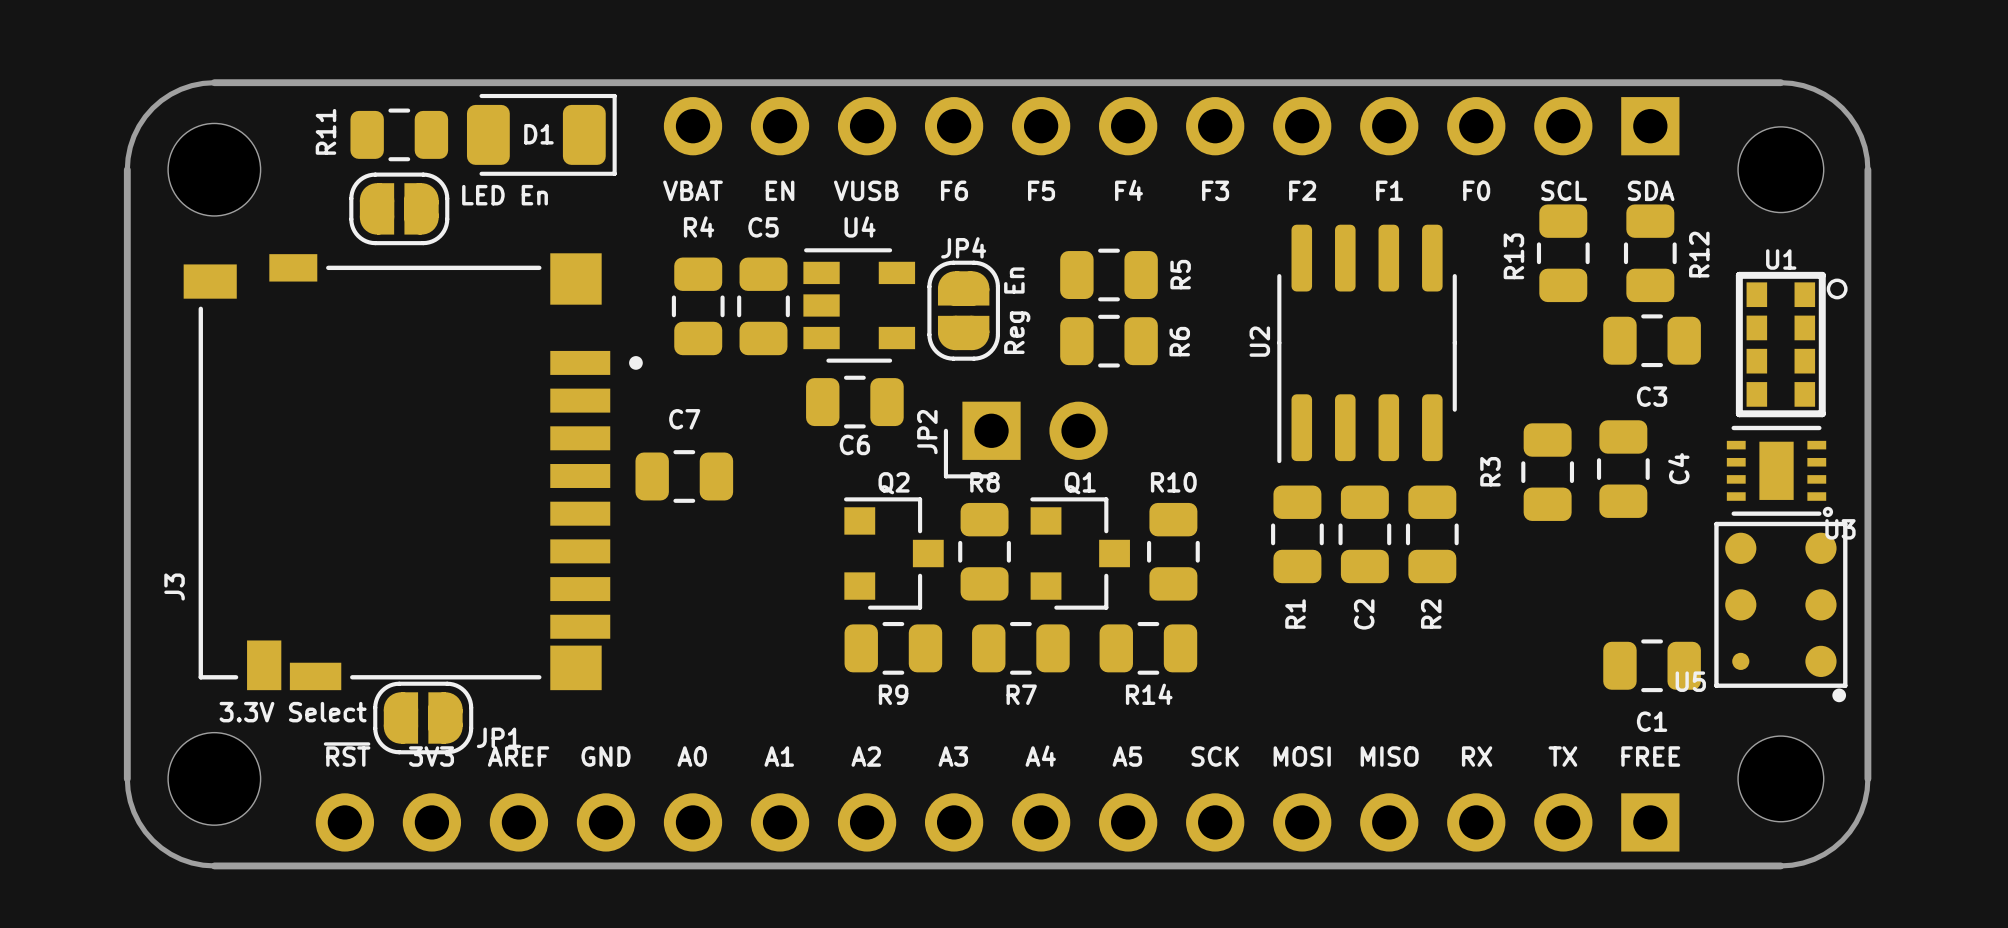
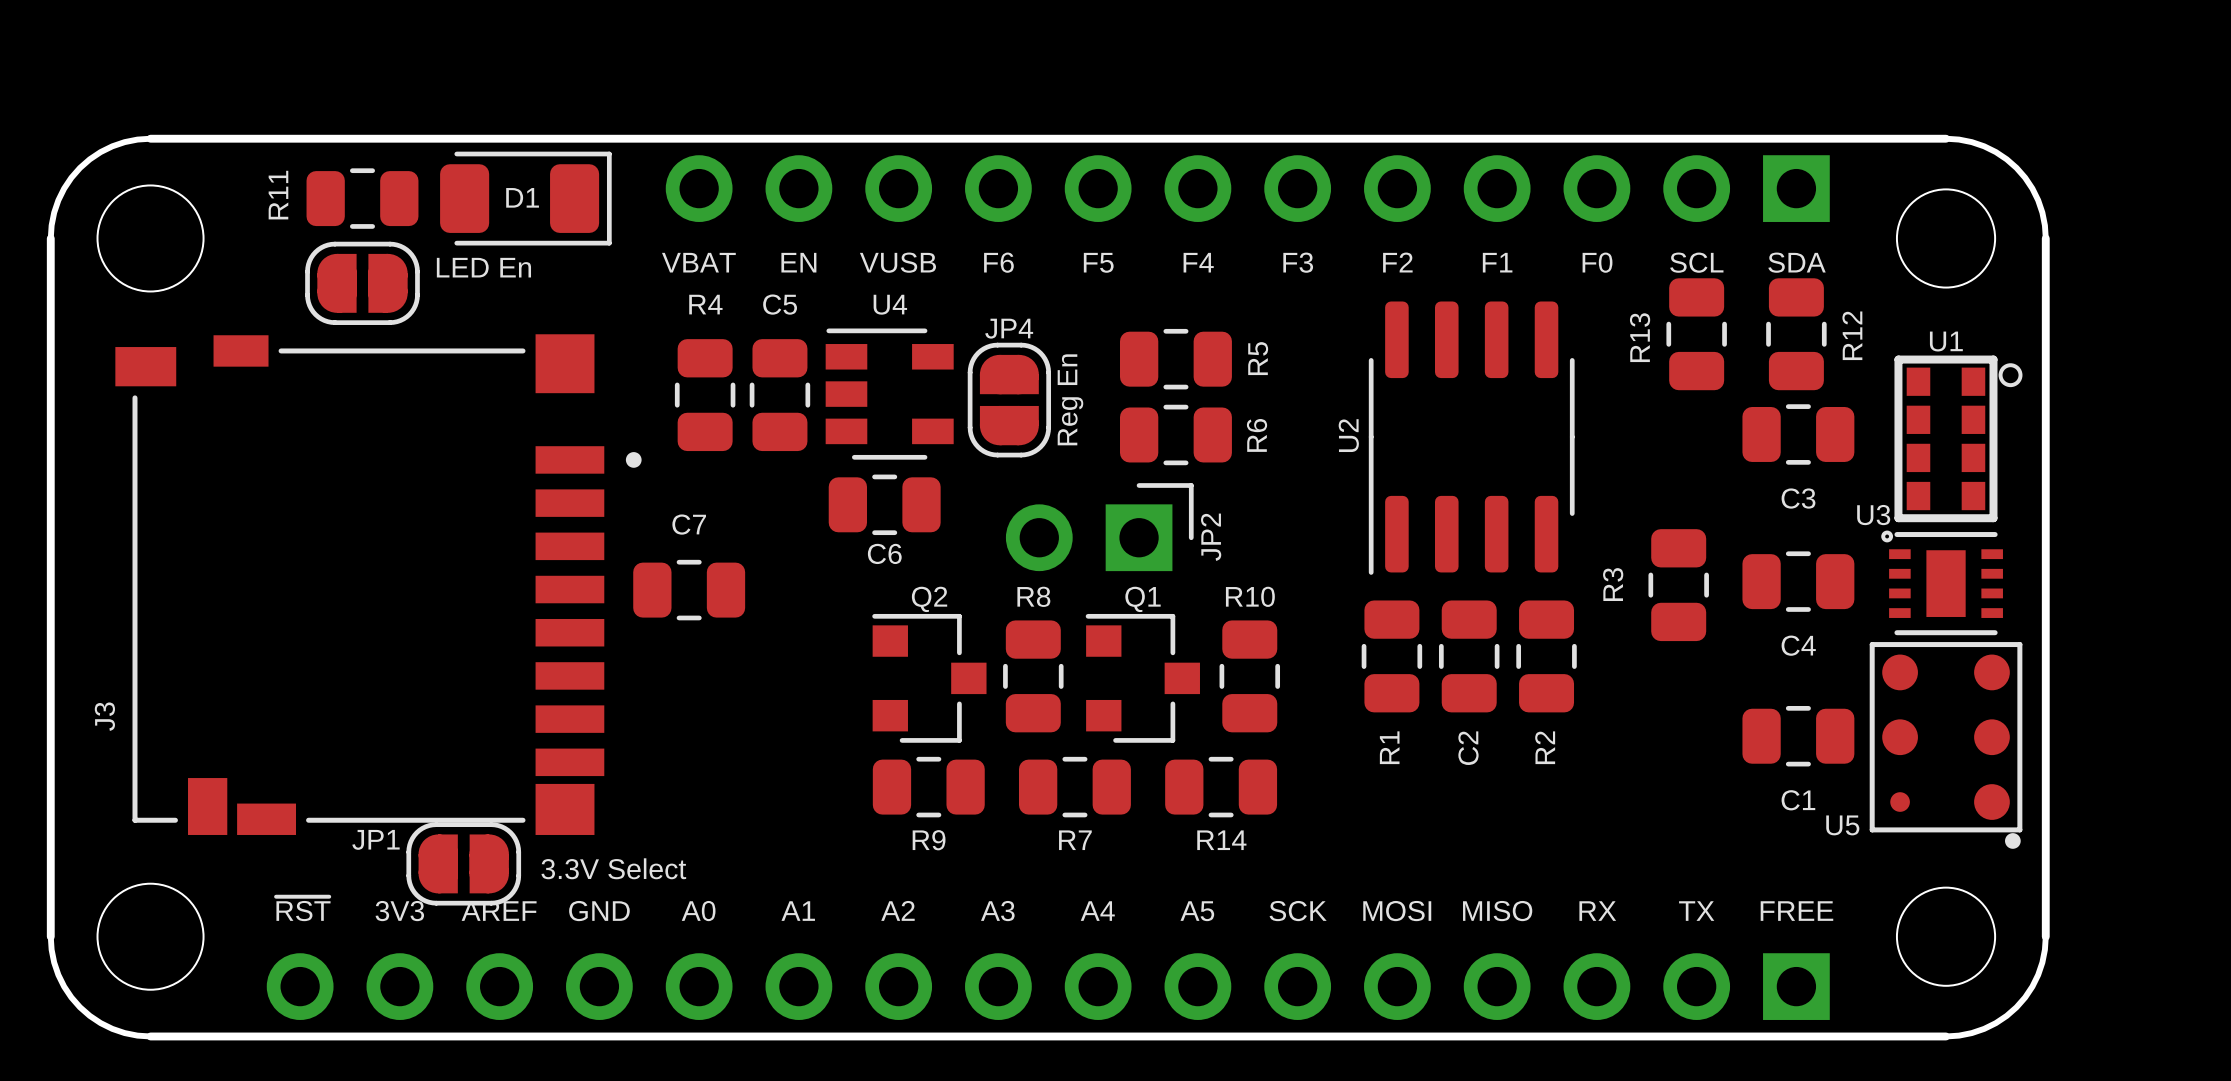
JP2 rotation: 0° (1025, 440) -> 180° (1099, 527)
C4 rotation: 0° (1623, 469) -> 90° clockwise (1798, 581)
U3 rotation: 0° (1779, 471) -> 180° (1942, 582)
C1 position: (1652, 665) -> (1798, 736)
JP1 value position: 3.3V Select (293, 712) -> 3.3V Select (613, 868)
JP1 position: (423, 717) -> (463, 863)
JP1 name position: JP1 (498, 737) -> JP1 (375, 839)

